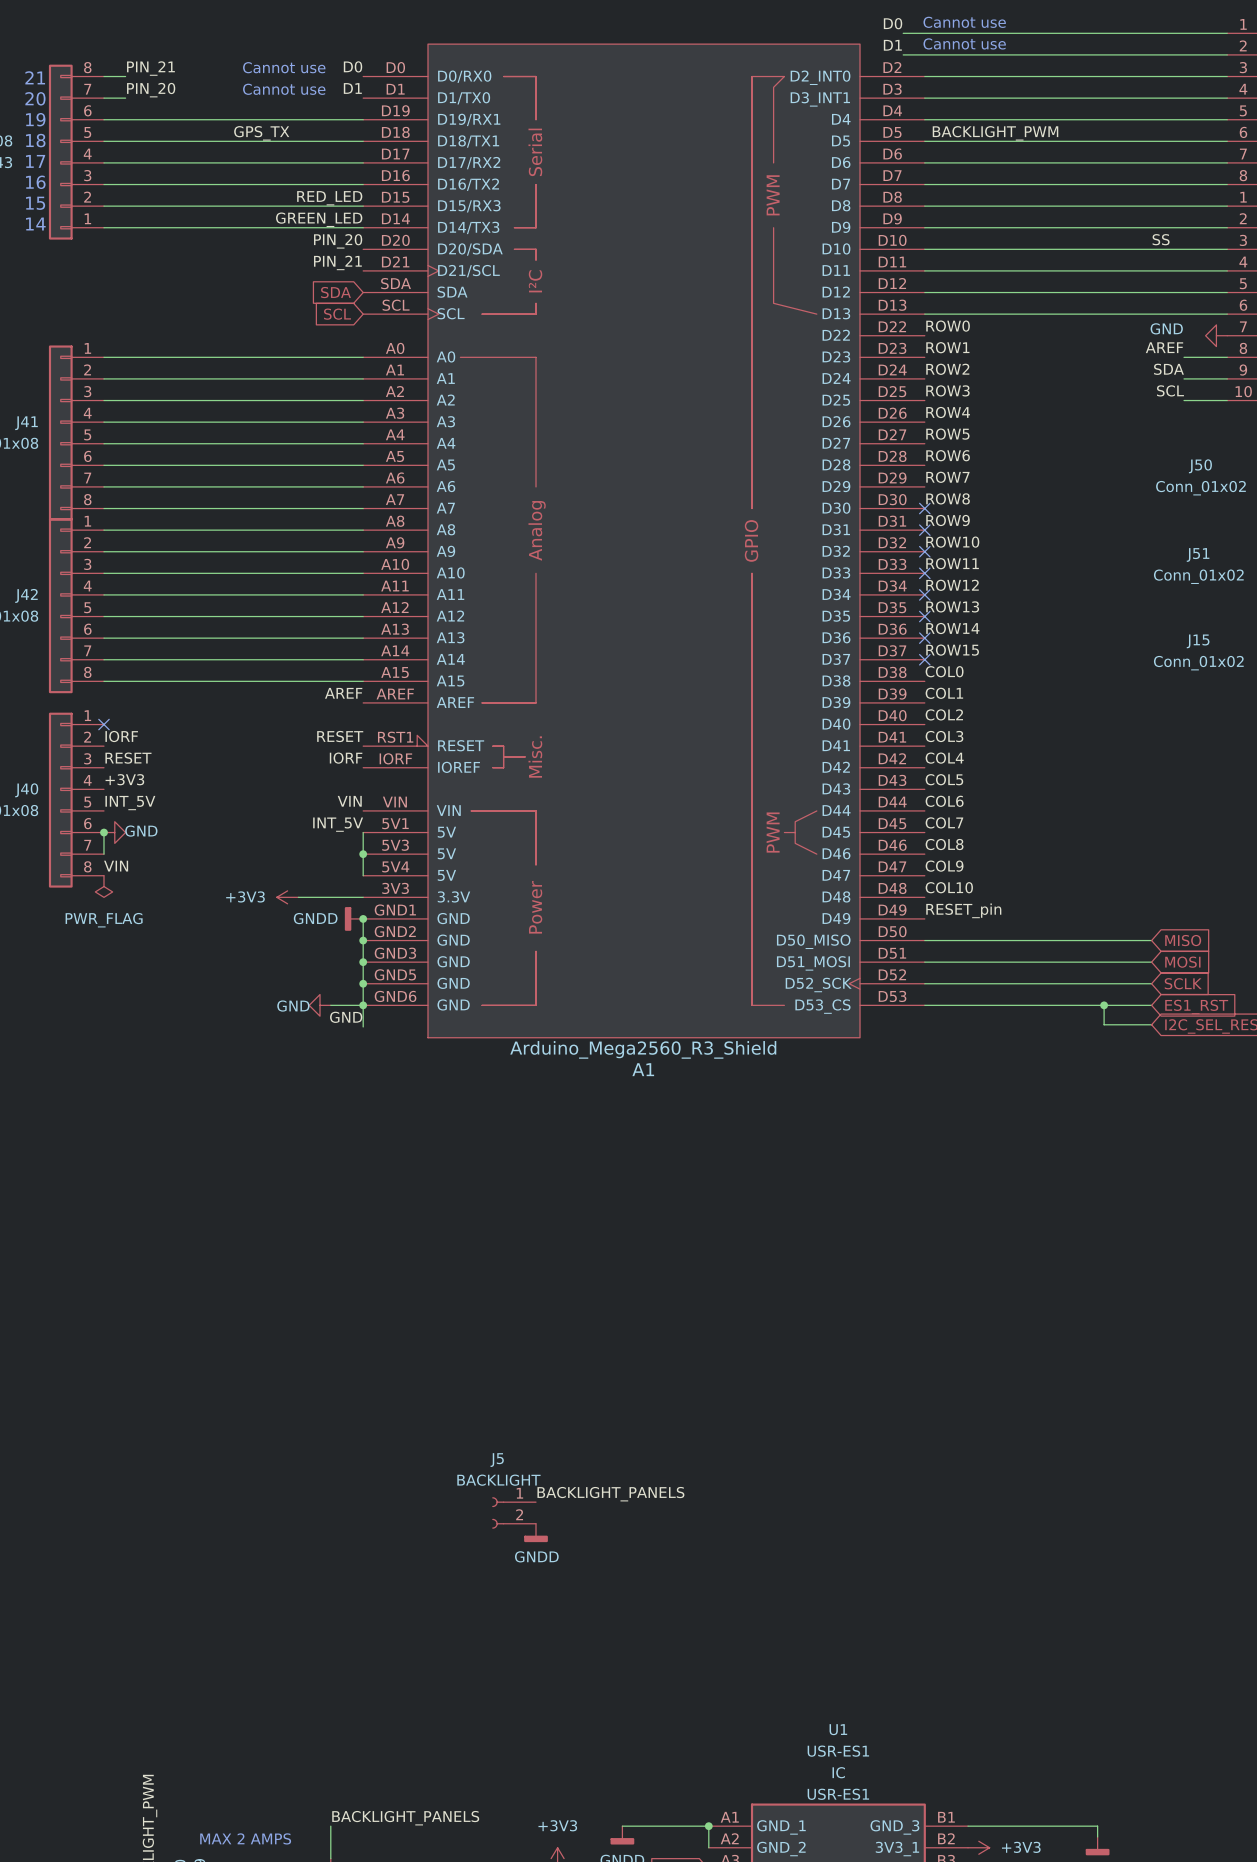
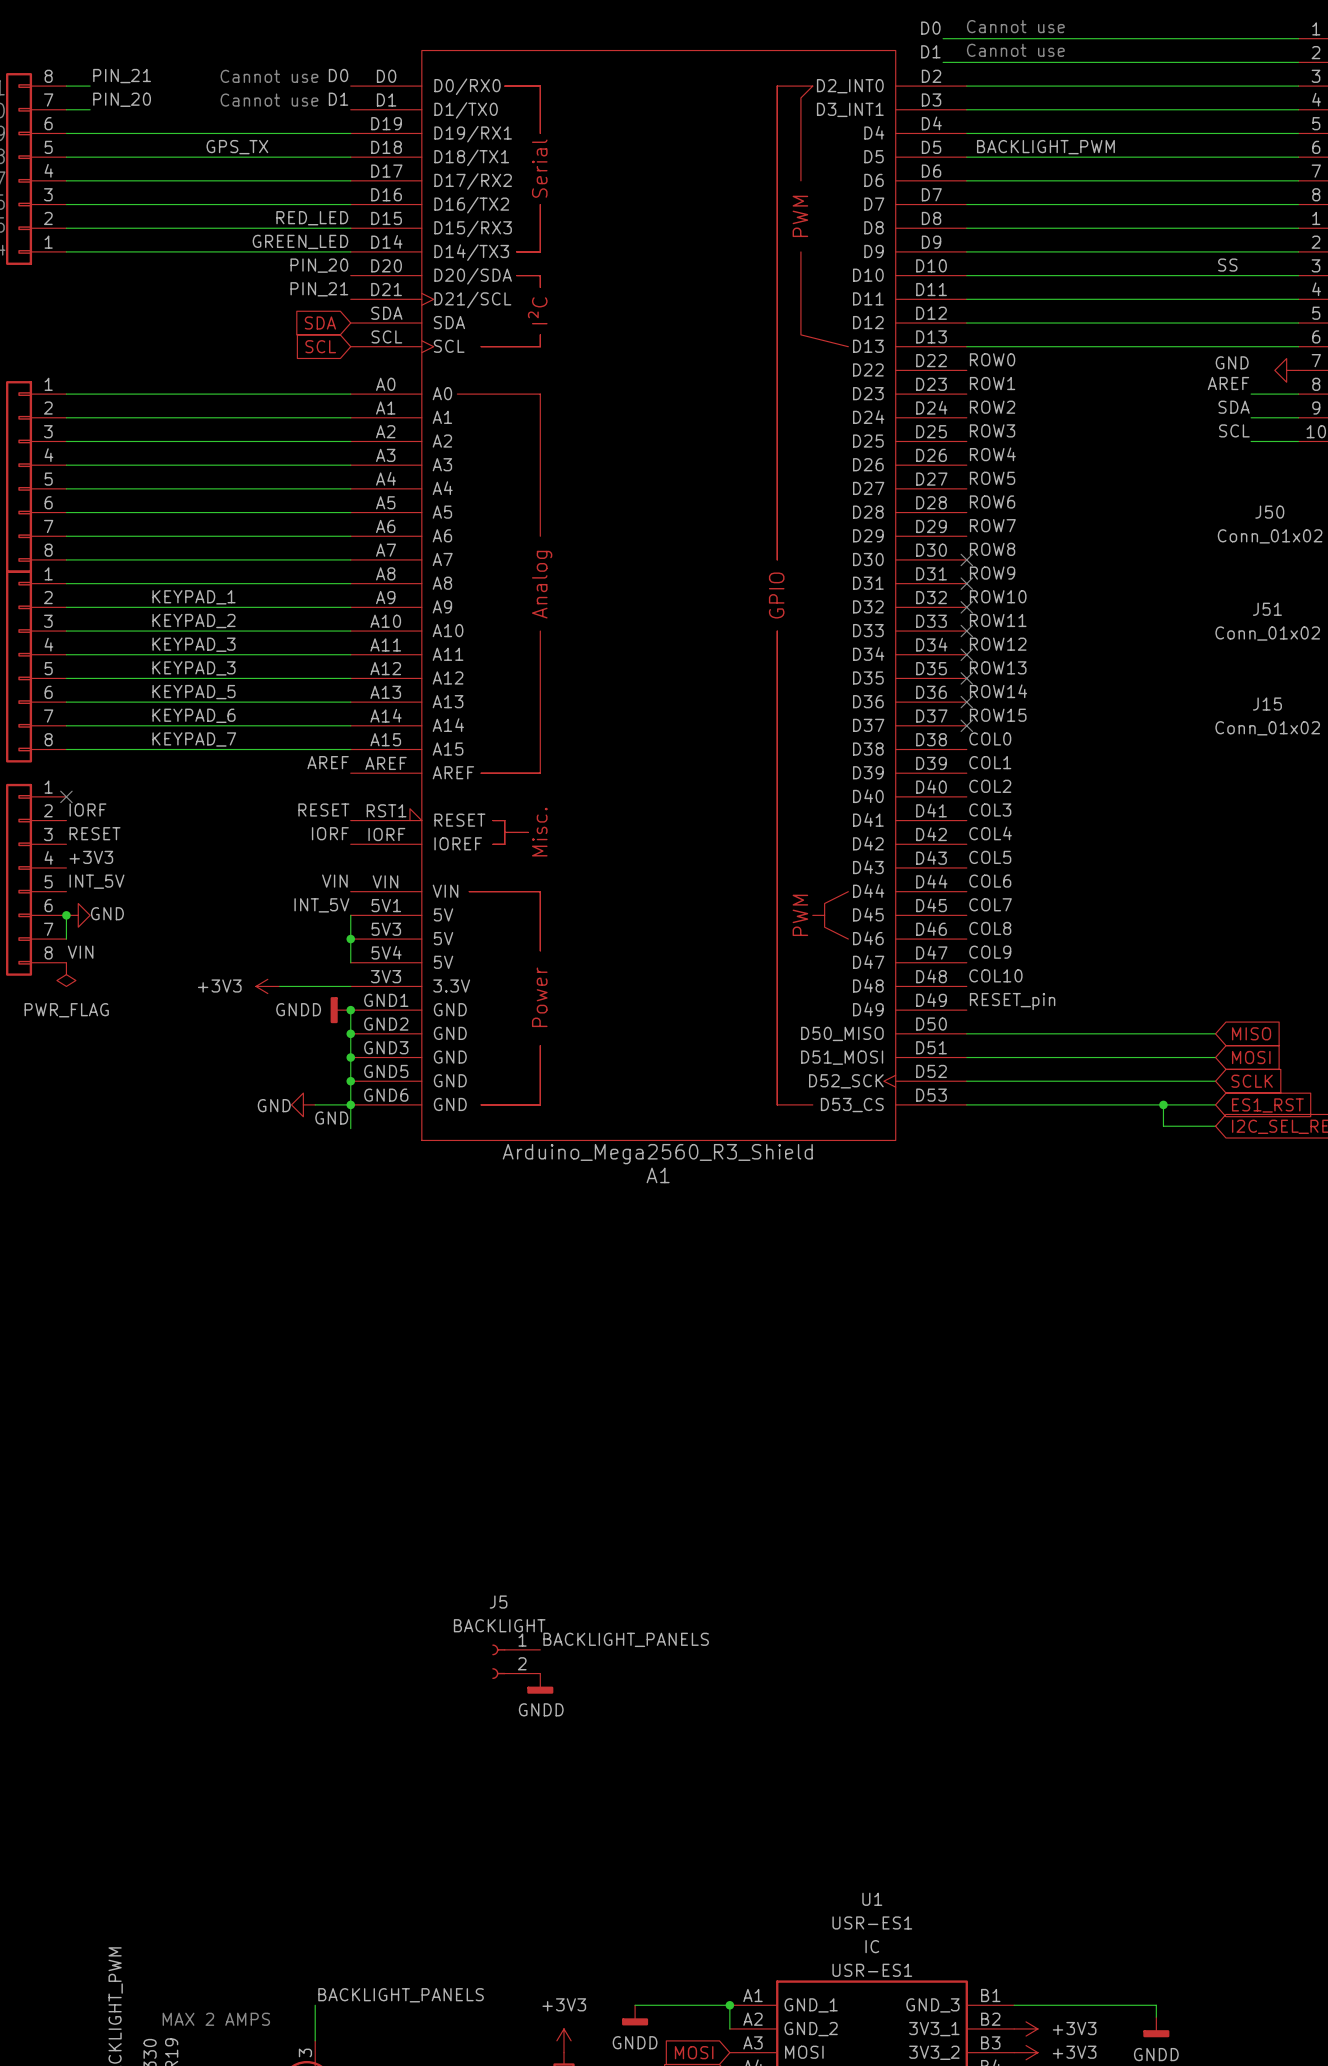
label: none -> KEYPAD_1 (194, 597)
label: none -> KEYPAD_2 (194, 621)
label: none -> KEYPAD_3 (194, 644)
label: none -> KEYPAD_3 (194, 668)
label: none -> KEYPAD_5 (194, 692)
label: none -> KEYPAD_6 (194, 715)
label: none -> KEYPAD_7 (194, 739)

